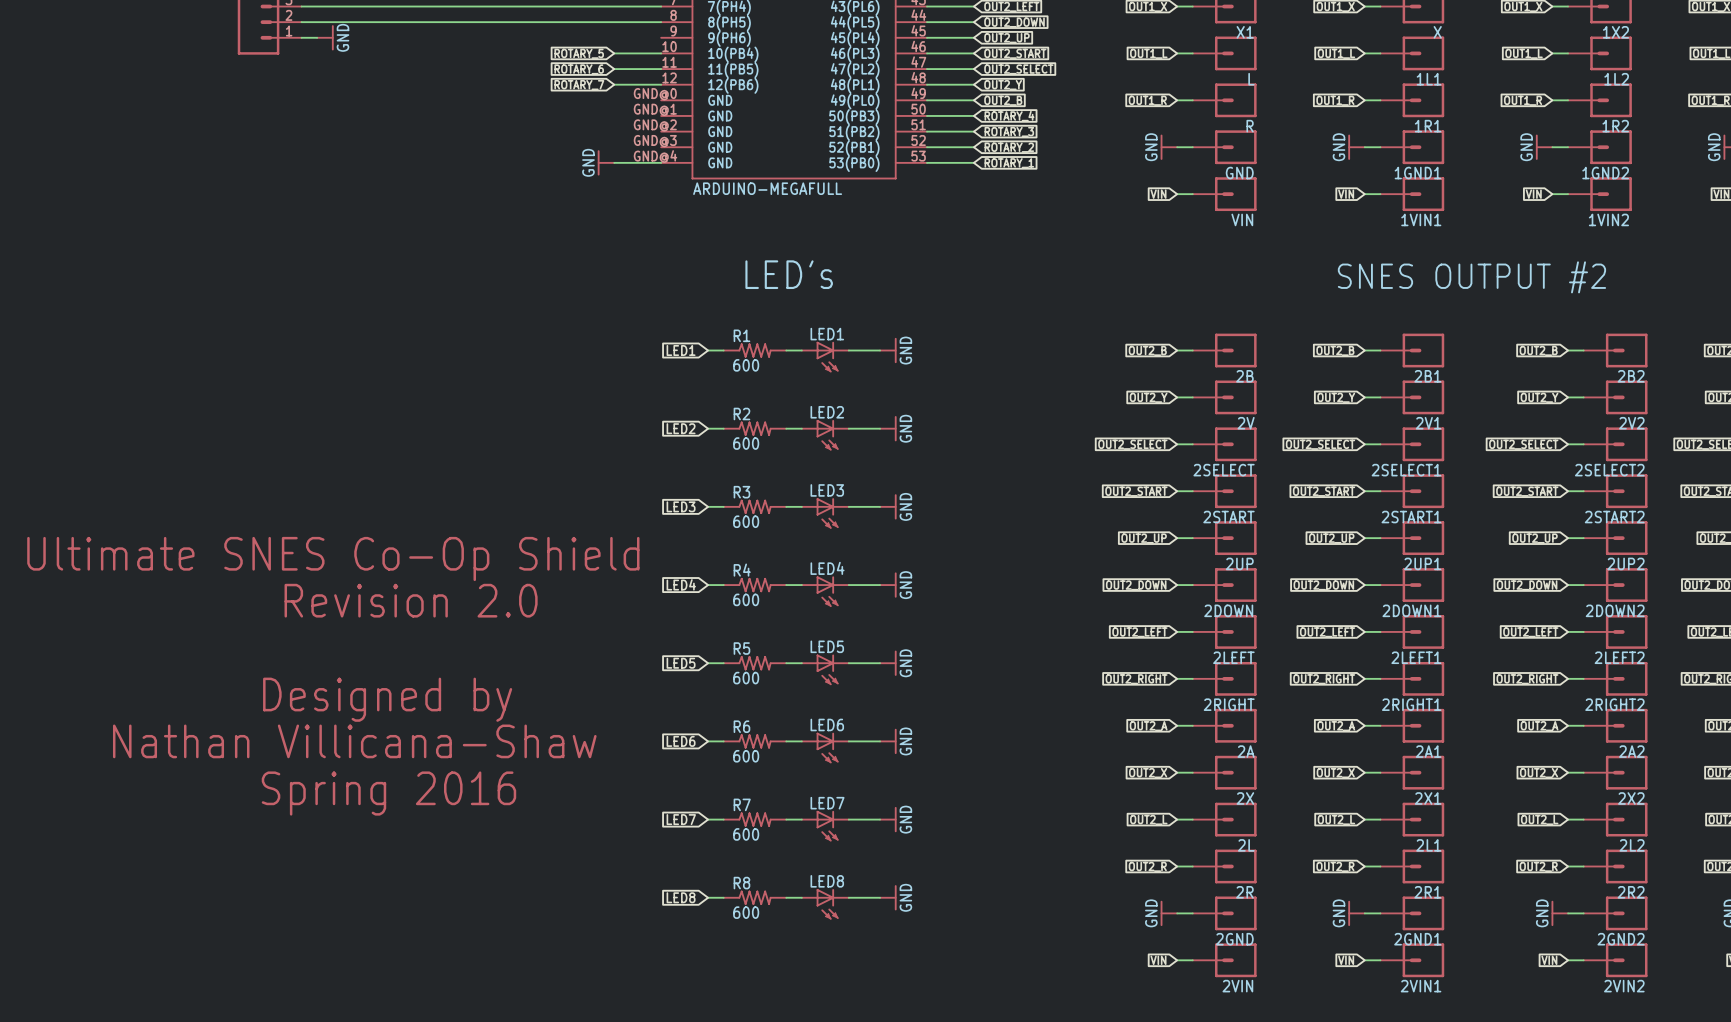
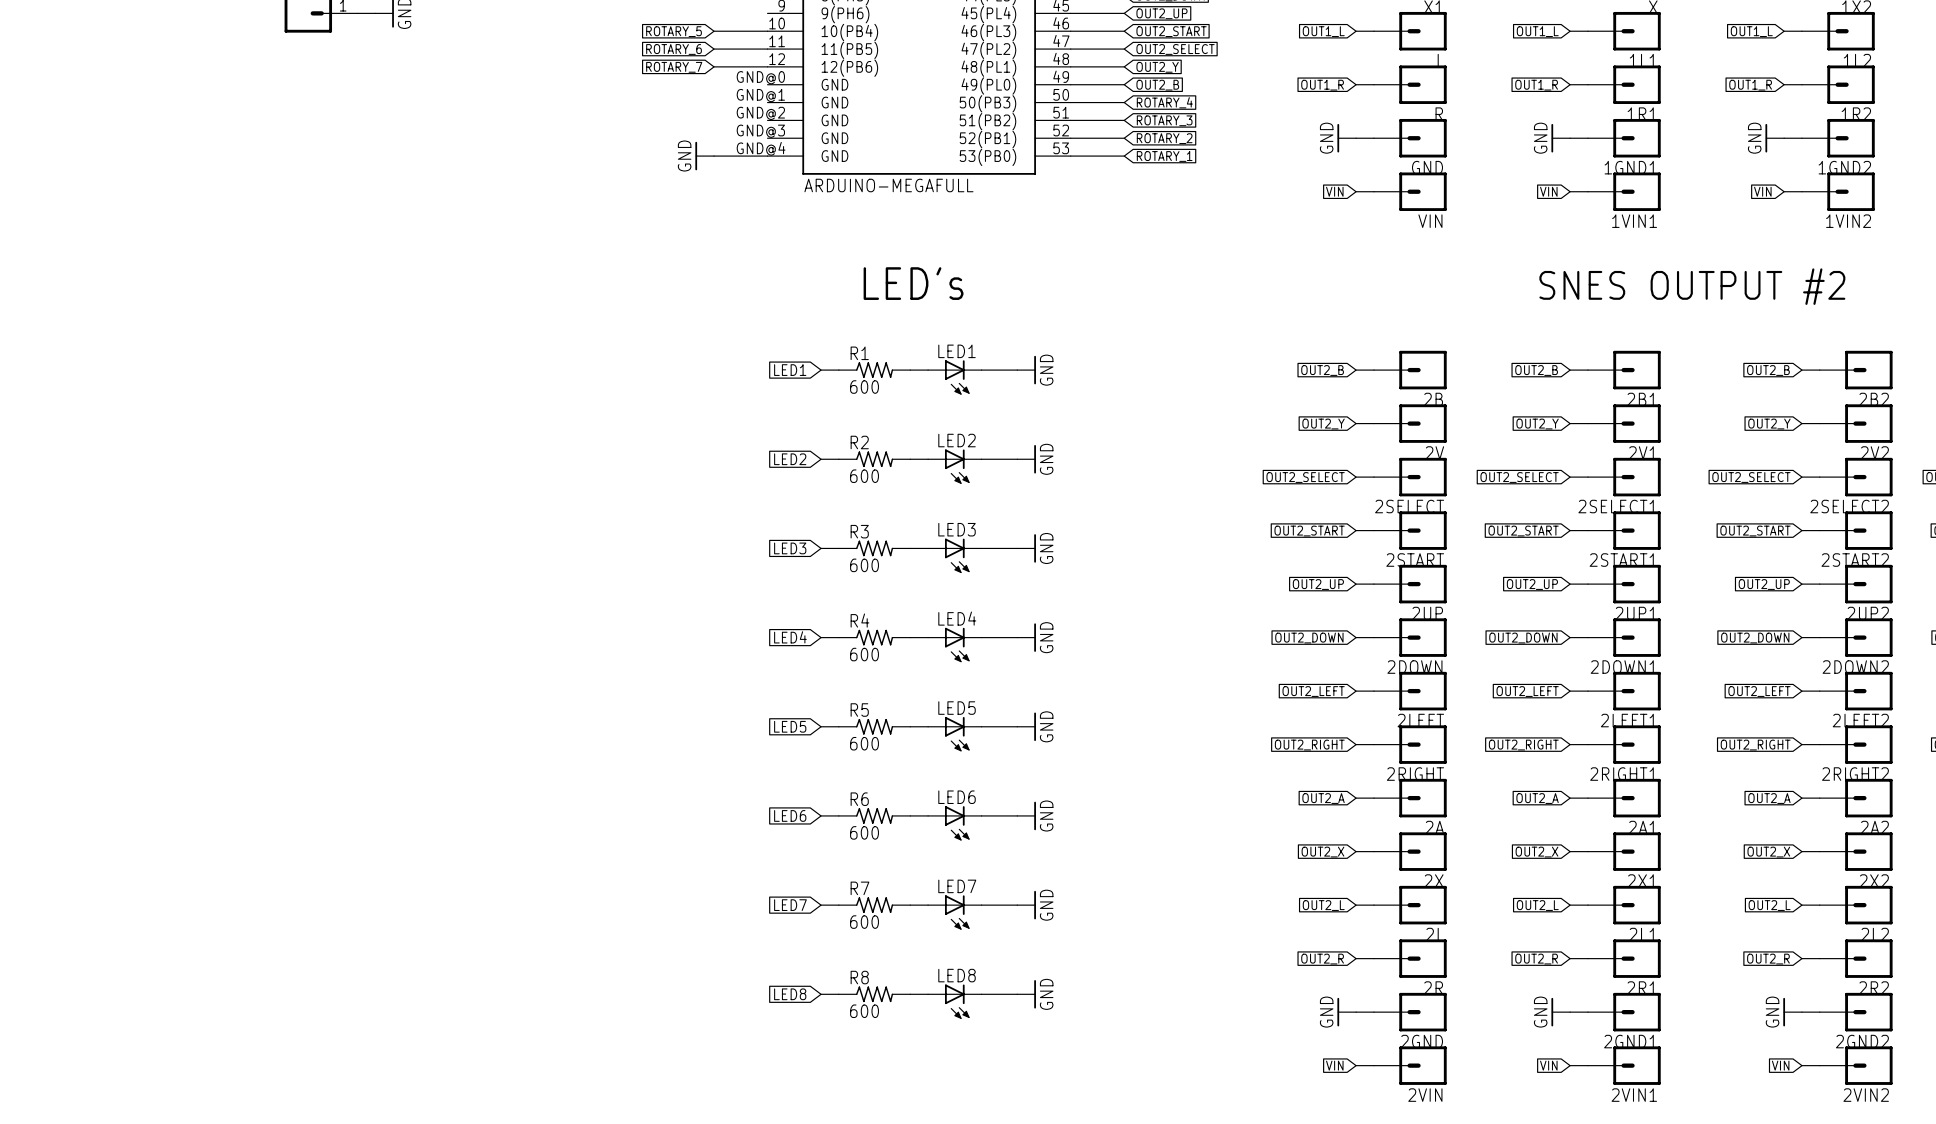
text: Ultimate SNES Co-Op Shield (333, 558) -> none
text: Revision 2.0 (411, 600) -> none
text: Designed by (387, 699) -> none
text: Nathan Villicana-Shaw (354, 741) -> none
text: Spring 2016 (388, 793) -> none

